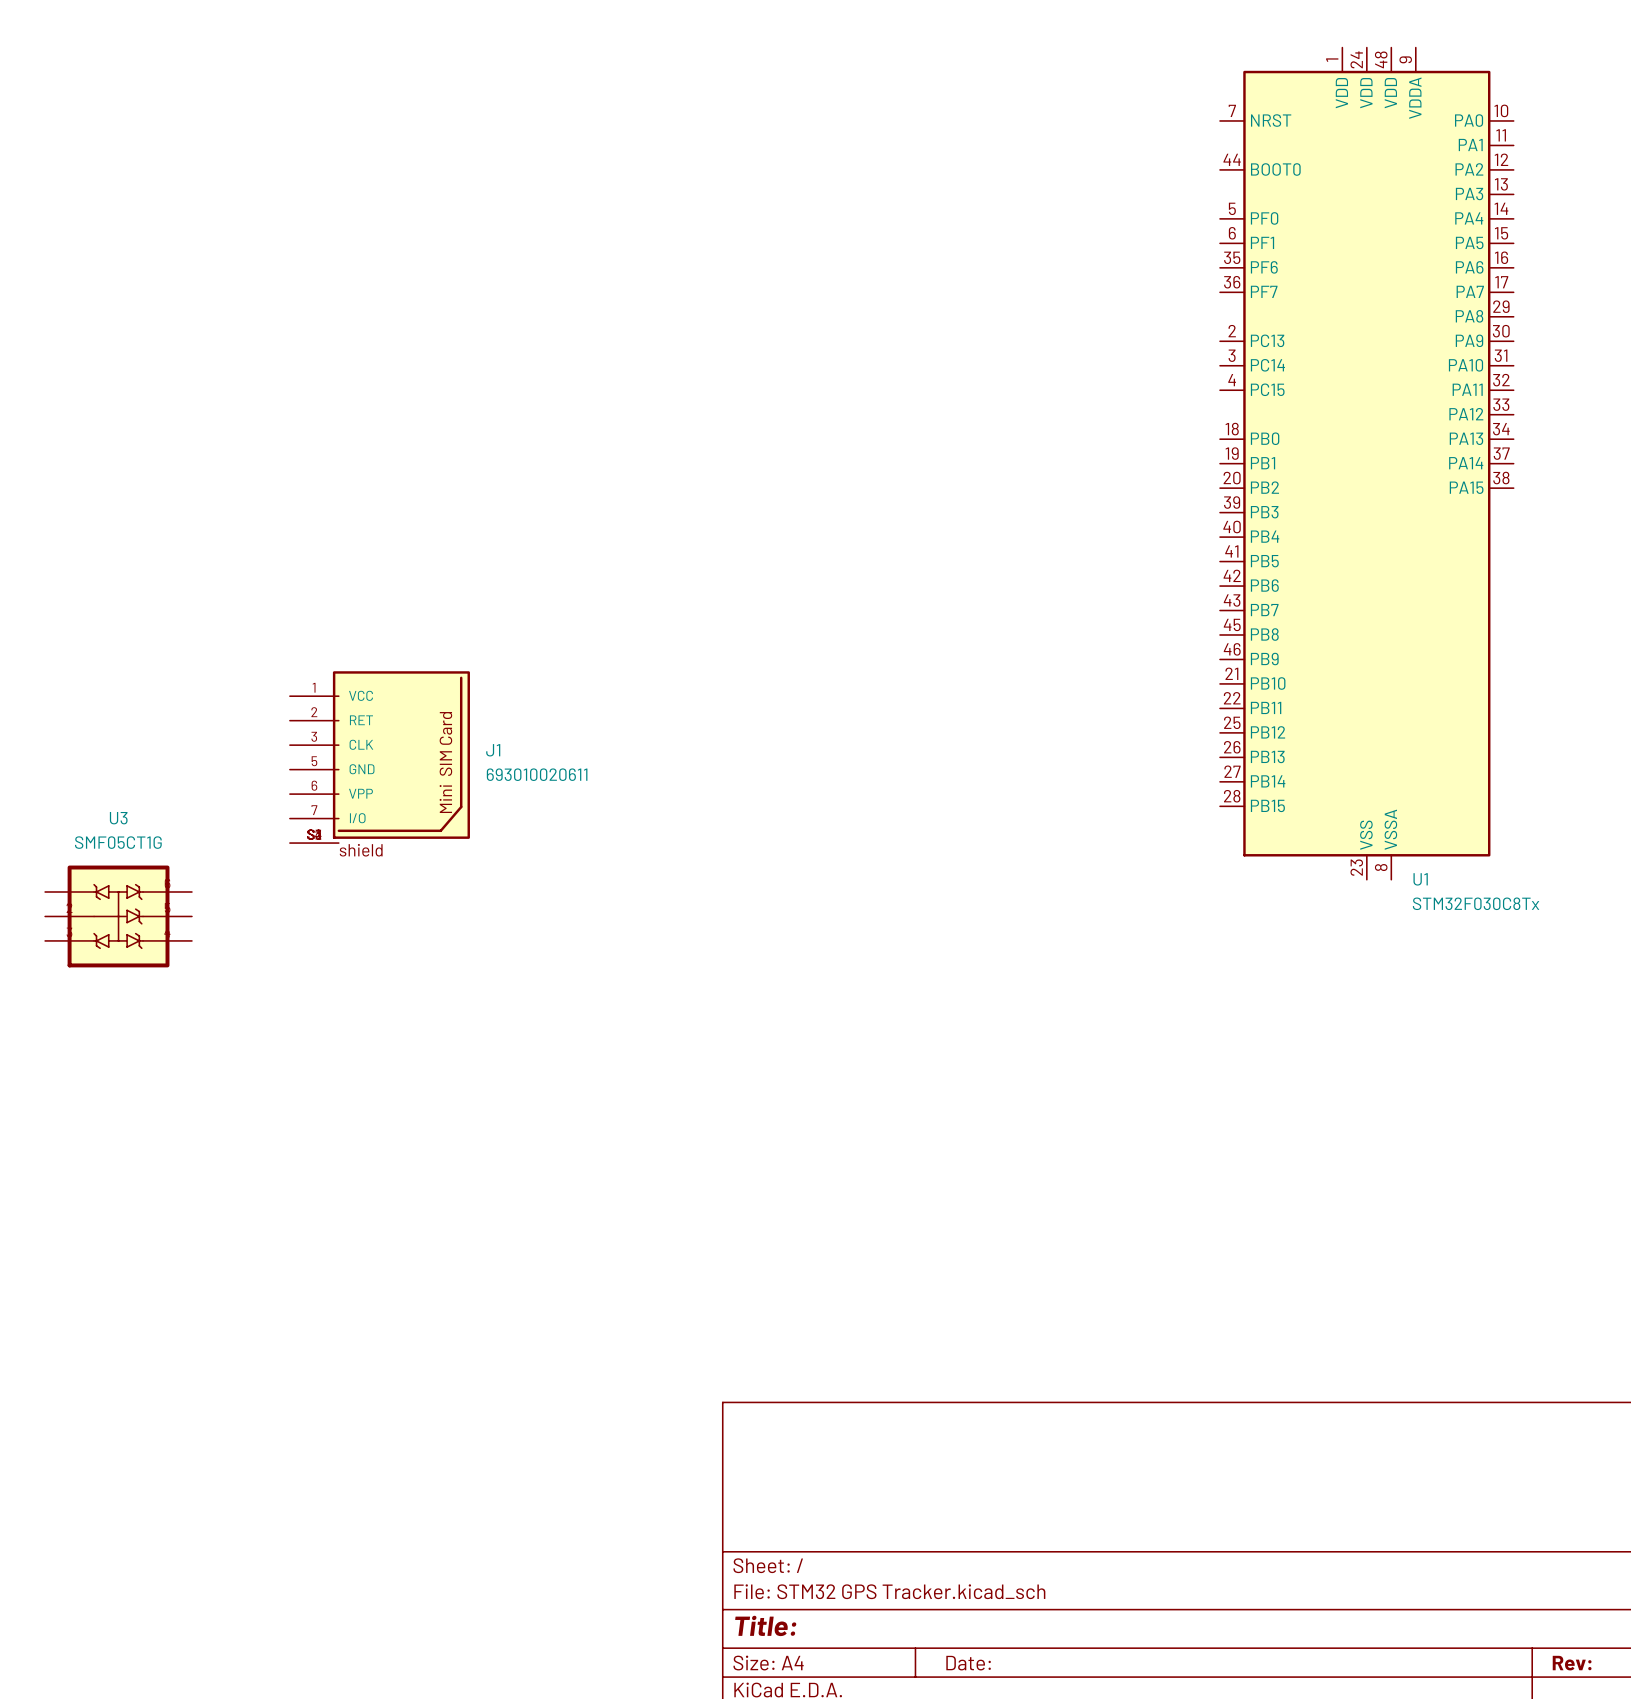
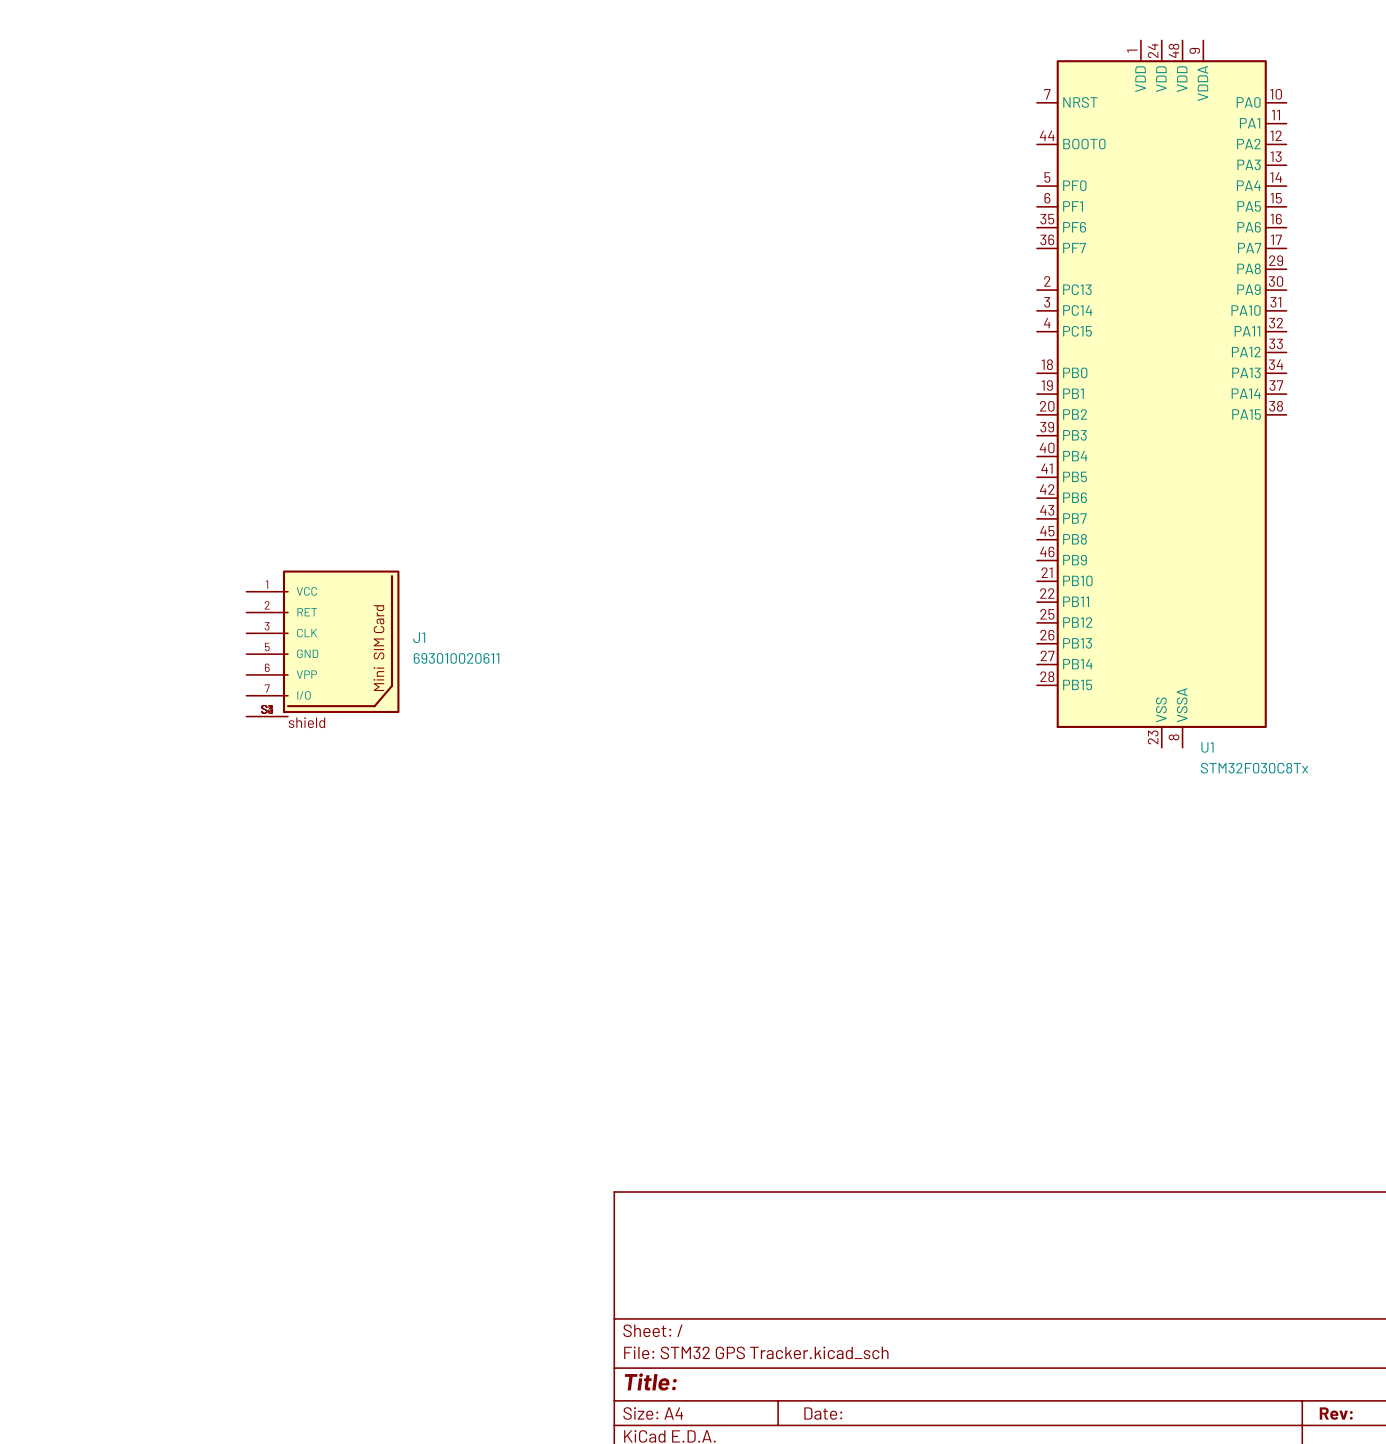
U3: SMF05CT1G (118, 916) -> none

